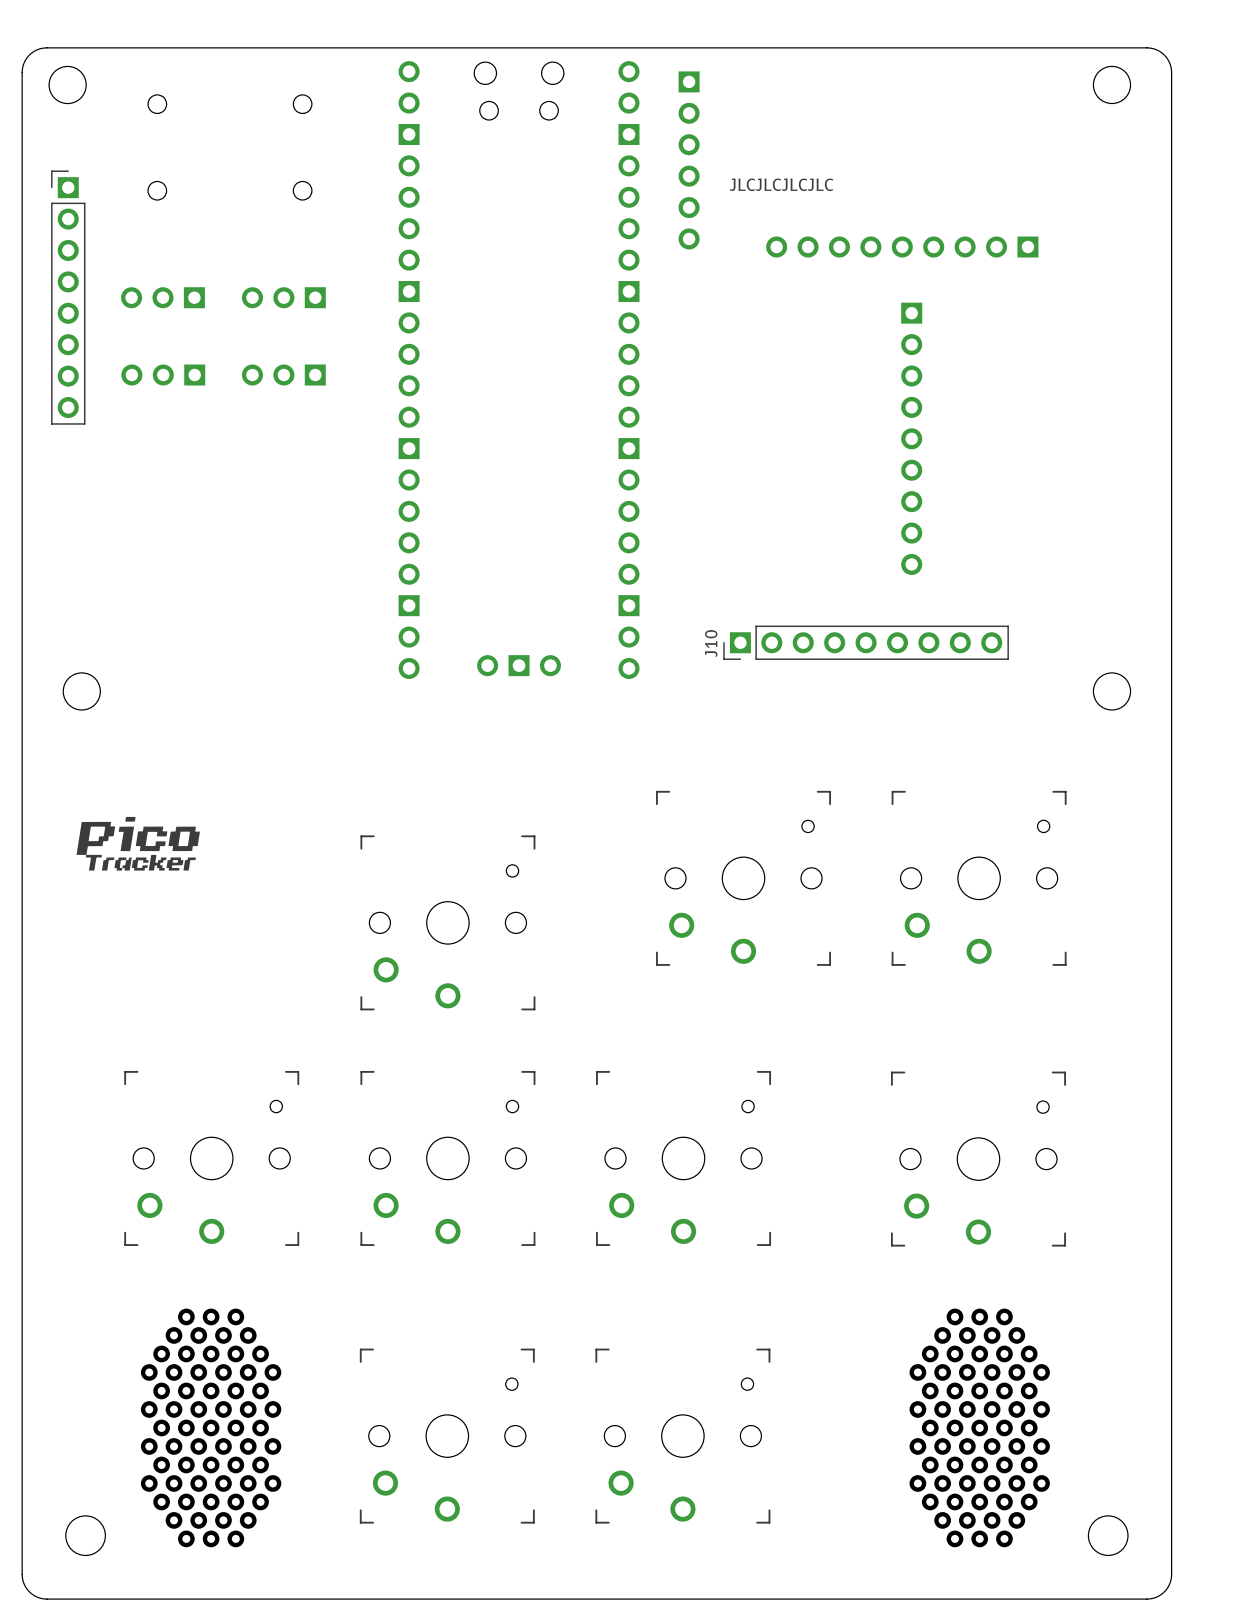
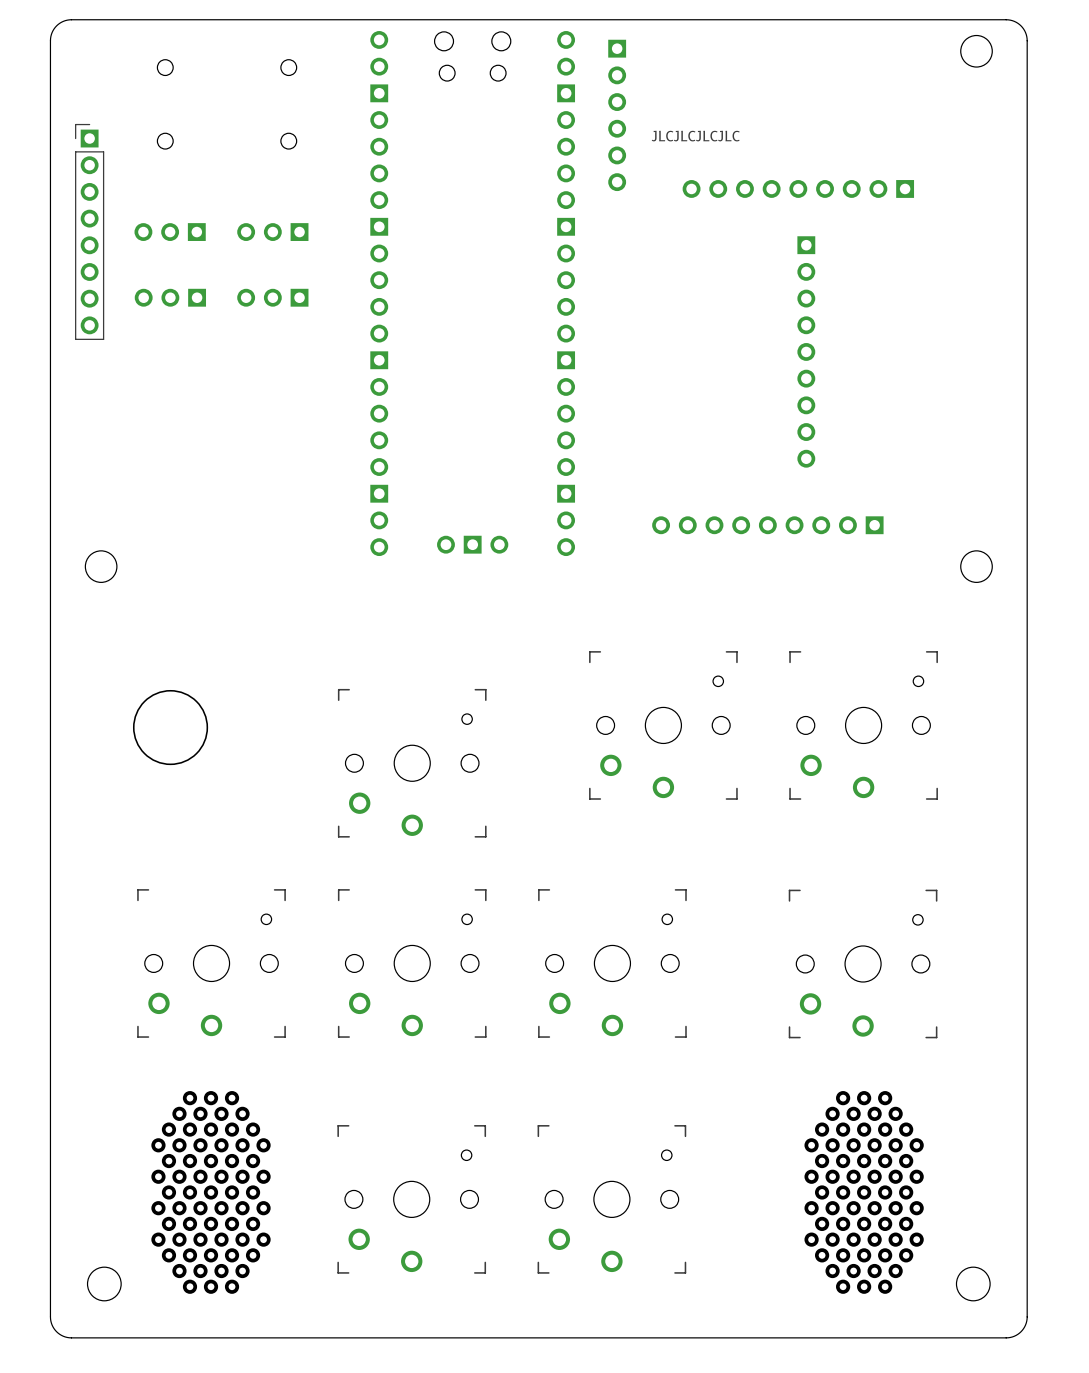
round board edge: [48, 65, 87, 105] -> none
J10 side: top (866, 642) -> bottom (767, 525)
drawing: [76, 816, 200, 871] -> none
round board edge: none -> [132, 689, 209, 766]

